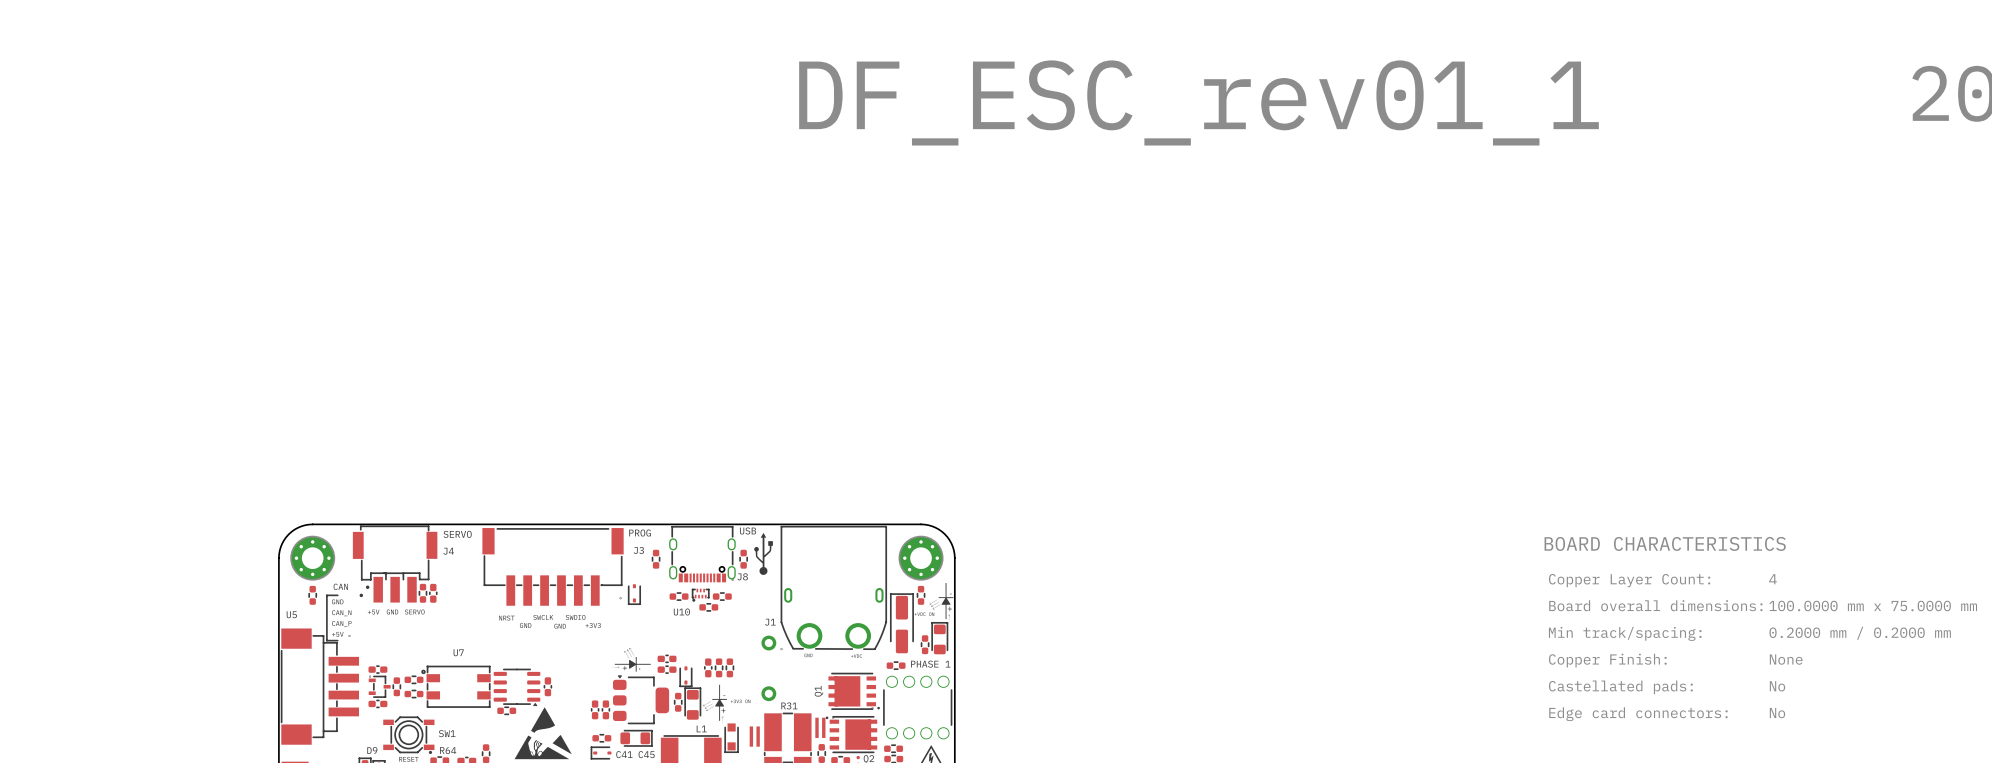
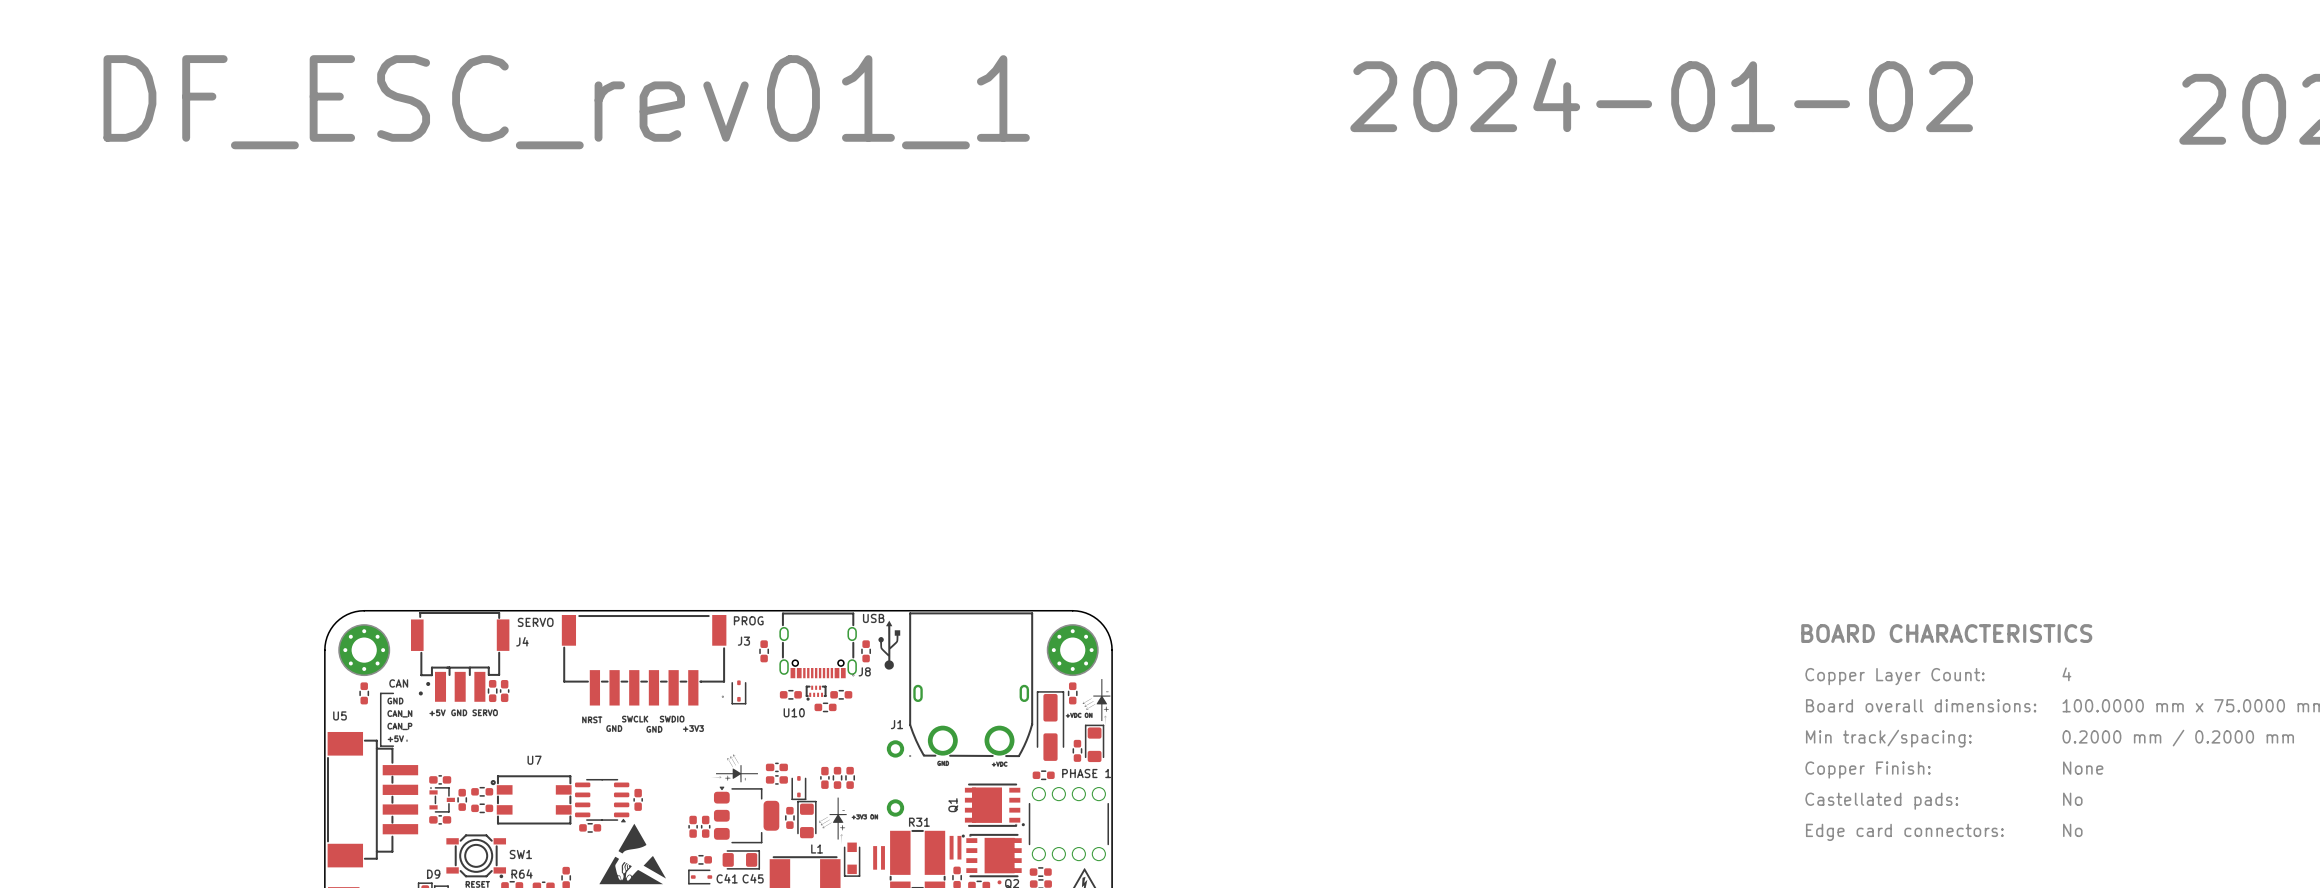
text: none -> 2024-01-02 (1661, 95)
text: none -> DF_ESC_rev01_1 (566, 102)
text: DF_ESC_rev01_1 (1198, 102) -> none

